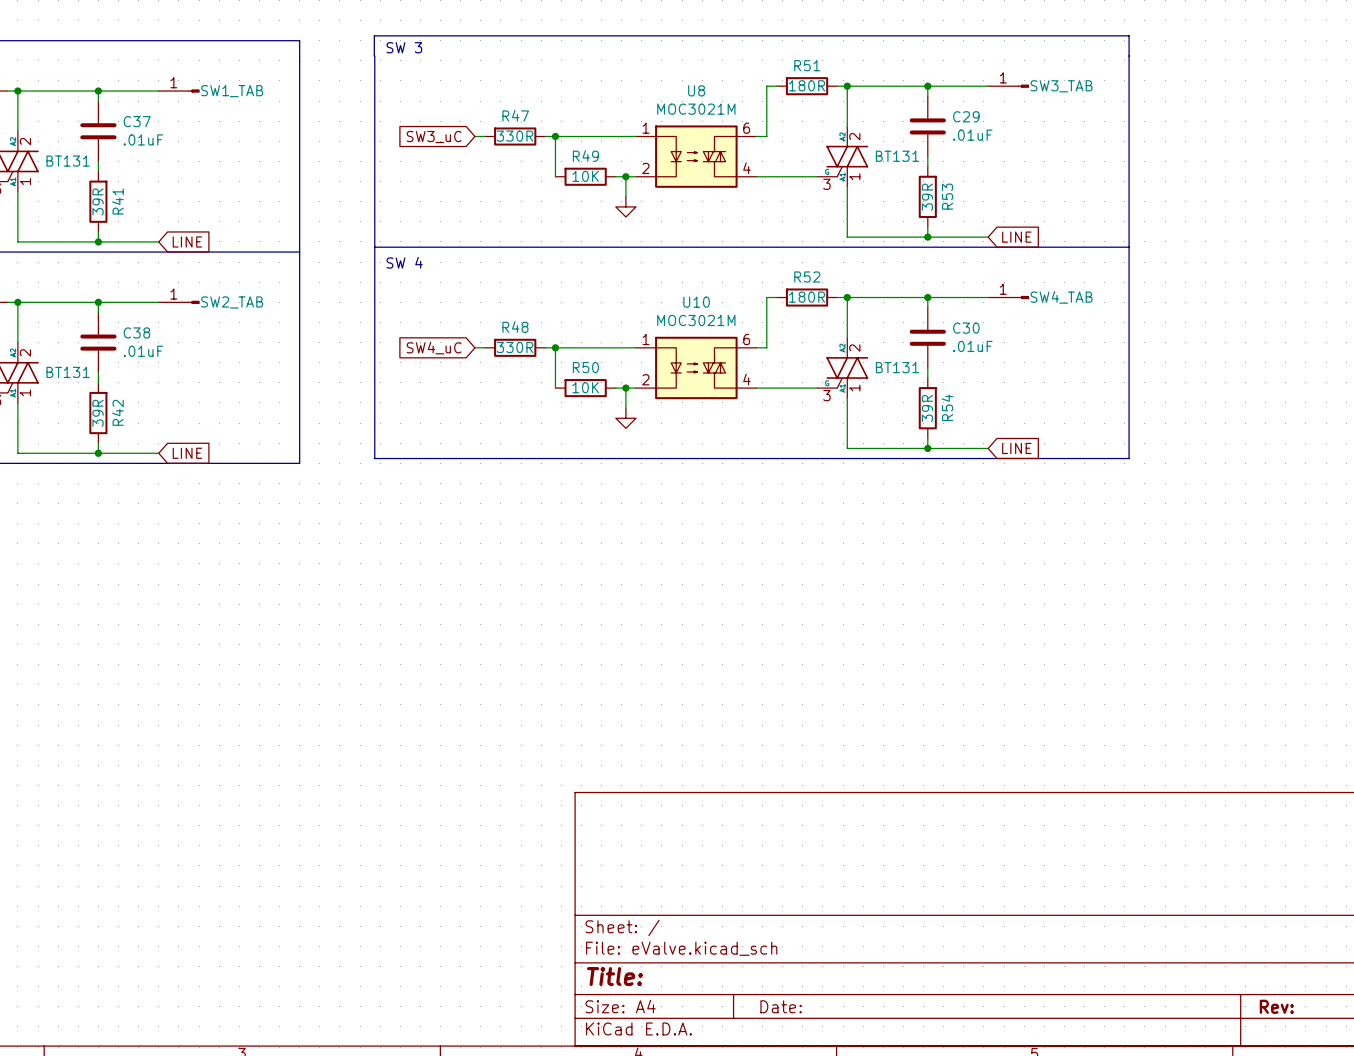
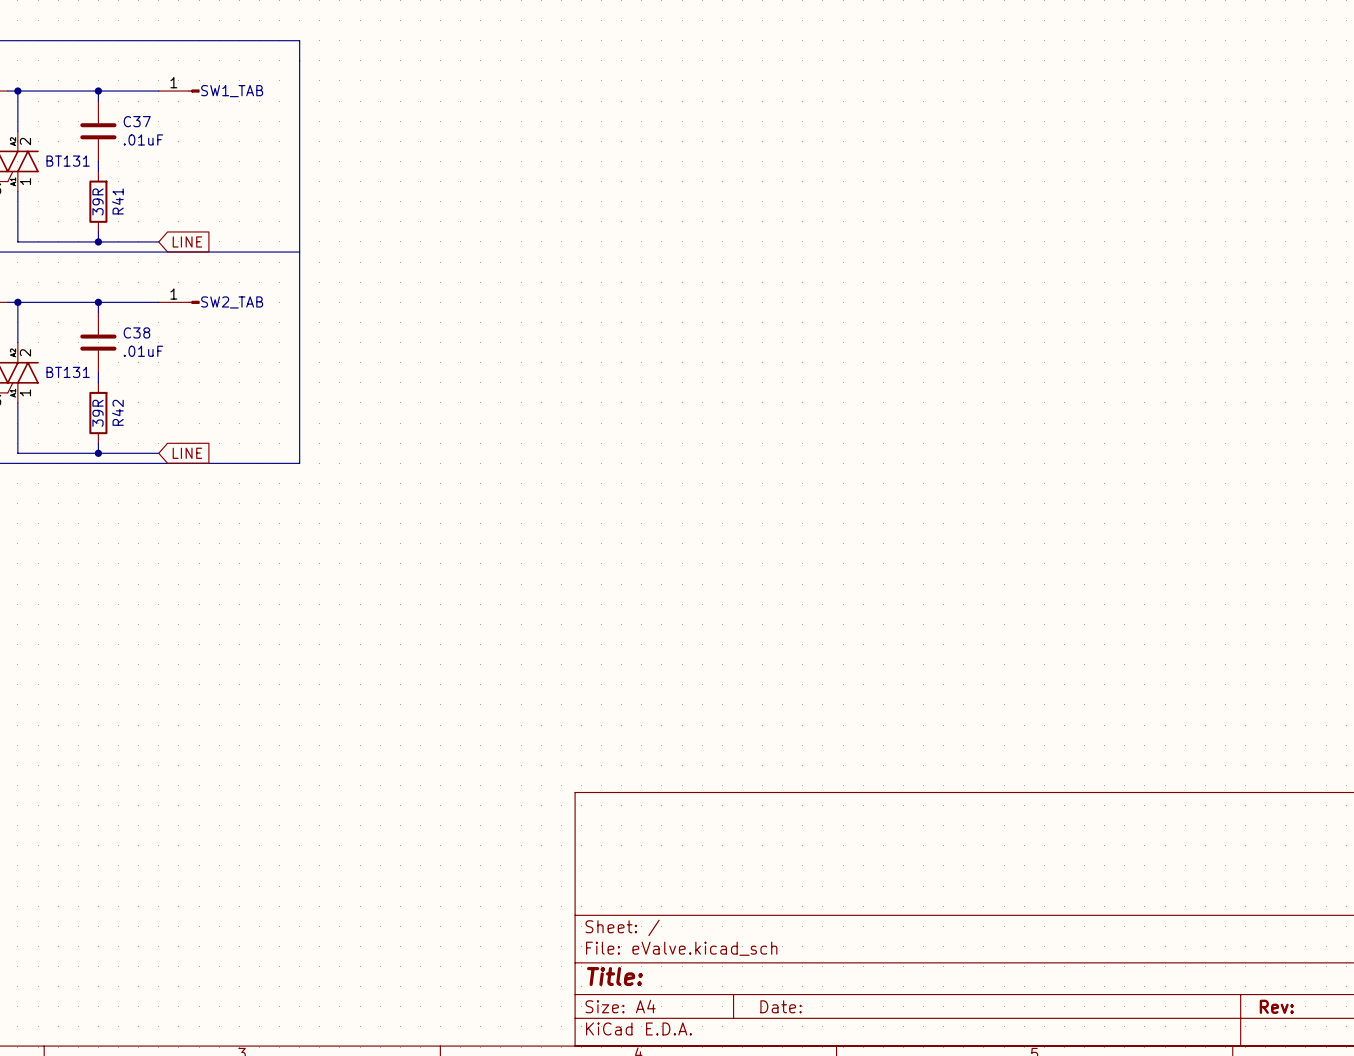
text: SW 3 (404, 47) -> none
line: (374, 55) (374, 35) (1129, 35) (1129, 458) (374, 458) -> none
line: (374, 55) (374, 458) -> none
wire: (776, 86) (766, 86) (766, 136) (756, 136) -> none
R51: 180R (807, 86) -> none
wire: (837, 86) (988, 86) -> none
wire: (847, 86) (847, 126) -> none
junction: (847, 86) -> none
wire: (927, 86) (927, 96) -> none
junction: (927, 86) -> none
part: SW3_TAB (1008, 86) -> none
C29: .01uF (927, 126) -> none
global label: SW3_uC (434, 136) -> none
wire: (474, 136) (485, 136) -> none
R47: 330R (515, 136) -> none
wire: (545, 136) (635, 136) -> none
wire: (555, 136) (555, 176) -> none
junction: (555, 136) -> none
U8: MOC3021M (696, 156) -> none
part: BT131 (842, 156) -> none
wire: (927, 156) (927, 166) -> none
R49: 10K (585, 176) -> none
wire: (615, 176) (635, 176) -> none
wire: (625, 176) (625, 196) -> none
junction: (625, 176) -> none
wire: (756, 176) (817, 176) -> none
wire: (847, 186) (847, 237) (988, 237) -> none
R53: 39R (927, 196) -> none
power symbol: (625, 206) -> none
wire: (927, 227) (927, 237) -> none
junction: (927, 237) -> none
global label: LINE (1016, 237) -> none
line: (374, 247) (1129, 247) -> none
text: SW 4 (404, 262) -> none
wire: (776, 297) (766, 297) (766, 347) (756, 347) -> none
R52: 180R (807, 297) -> none
wire: (837, 297) (988, 297) -> none
wire: (847, 297) (847, 337) -> none
junction: (847, 297) -> none
wire: (927, 297) (927, 307) -> none
junction: (927, 297) -> none
part: SW4_TAB (1008, 297) -> none
C30: .01uF (927, 337) -> none
wire: (474, 347) (485, 347) -> none
R48: 330R (515, 347) -> none
wire: (545, 347) (635, 347) -> none
wire: (555, 347) (555, 388) -> none
junction: (555, 347) -> none
global label: SW4_uC (434, 348) -> none
U10: MOC3021M (696, 367) -> none
part: BT131 (842, 367) -> none
wire: (927, 367) (927, 378) -> none
R50: 10K (585, 388) -> none
wire: (615, 388) (635, 388) -> none
wire: (625, 388) (625, 408) -> none
junction: (625, 388) -> none
wire: (756, 388) (817, 388) -> none
wire: (847, 398) (847, 448) (988, 448) -> none
R54: 39R (927, 408) -> none
power symbol: (625, 418) -> none
wire: (927, 438) (927, 448) -> none
junction: (927, 448) -> none
global label: LINE (1016, 448) -> none

